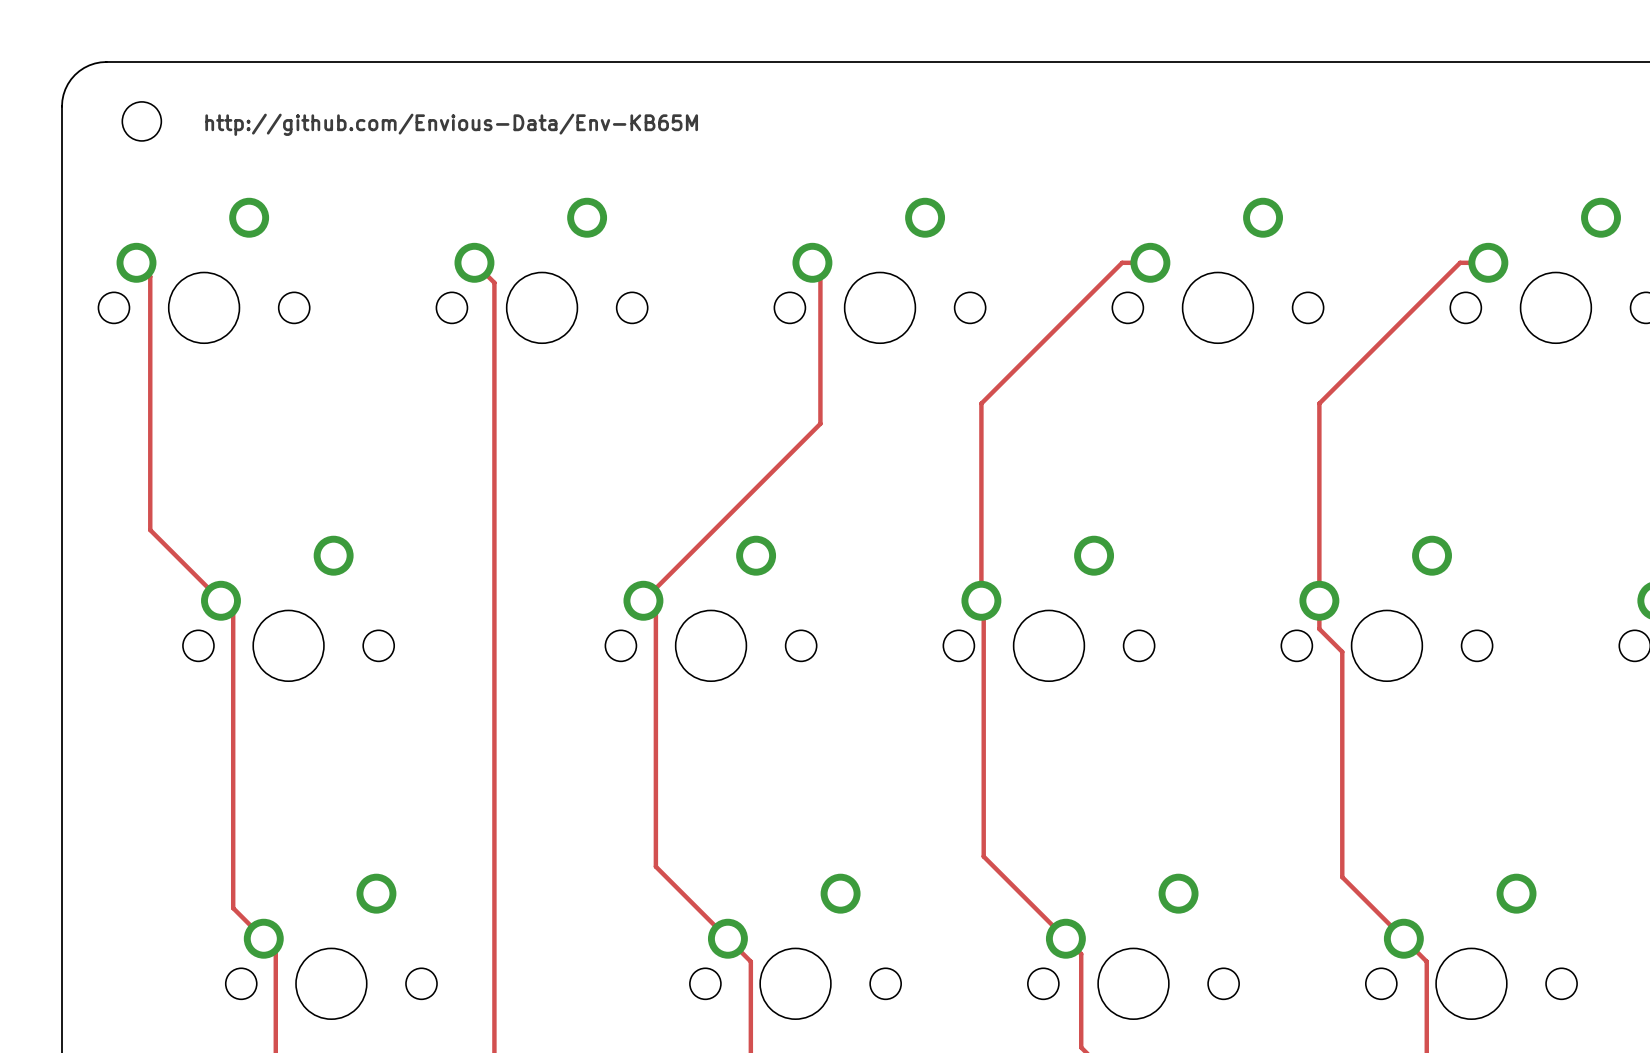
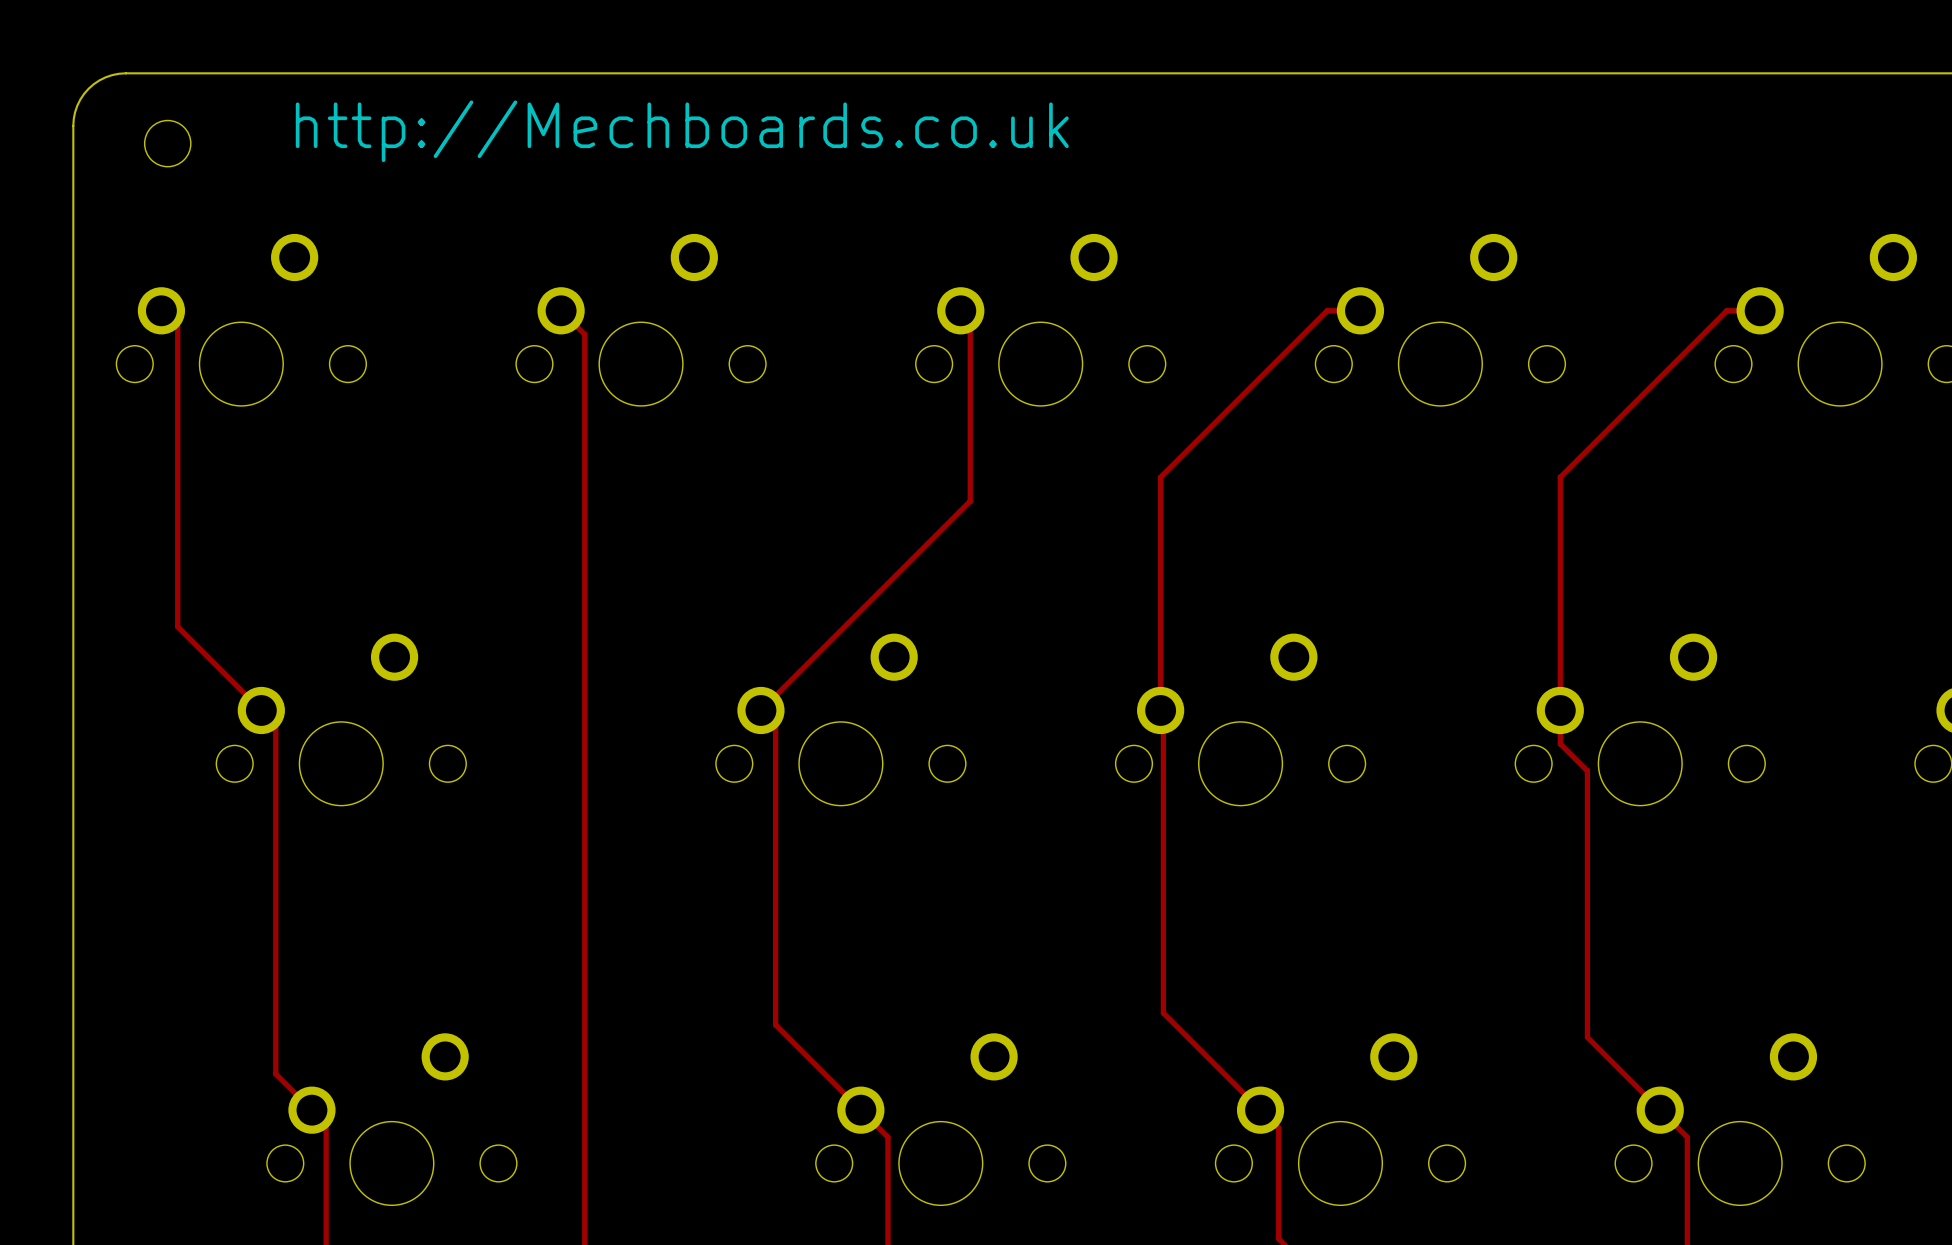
text: none -> http://Mechboards.co.uk (682, 131)
text: http://github.com/Envious-Data/Env-KB65M (451, 124) -> none

